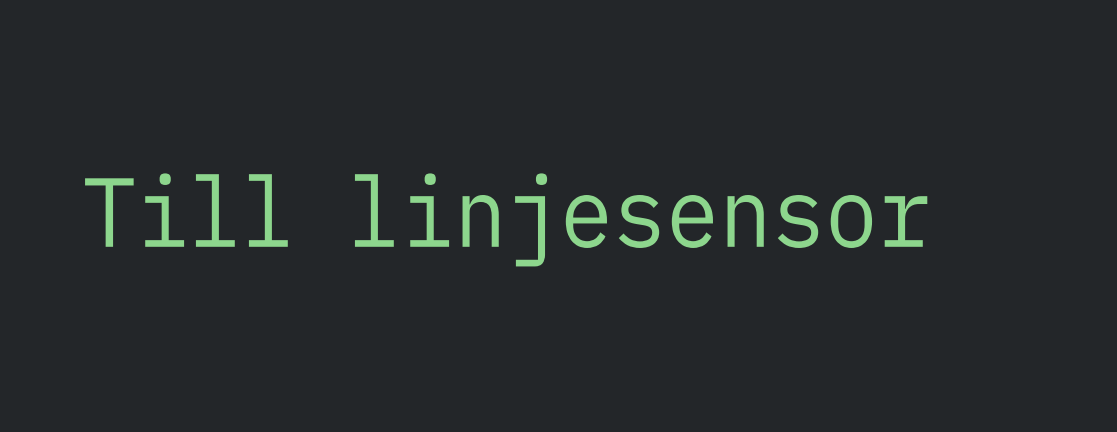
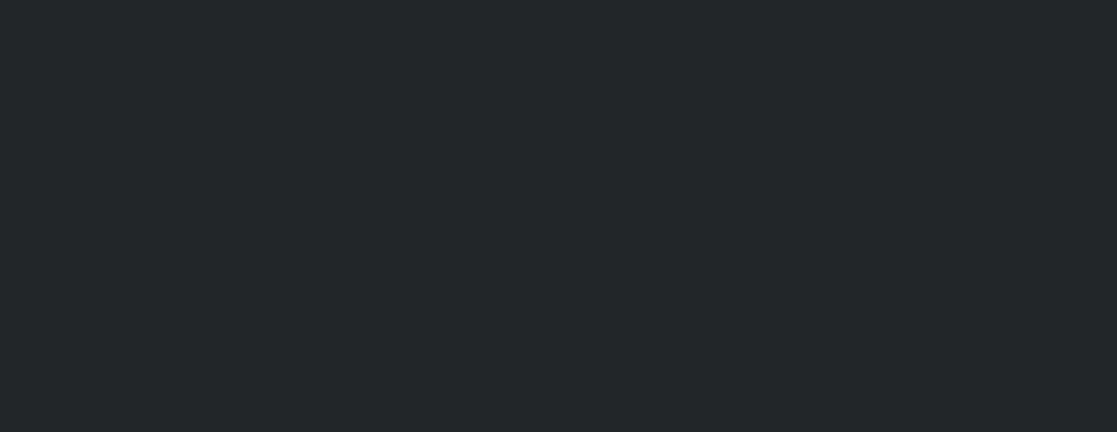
text: Till linjesensor (506, 219) -> none

